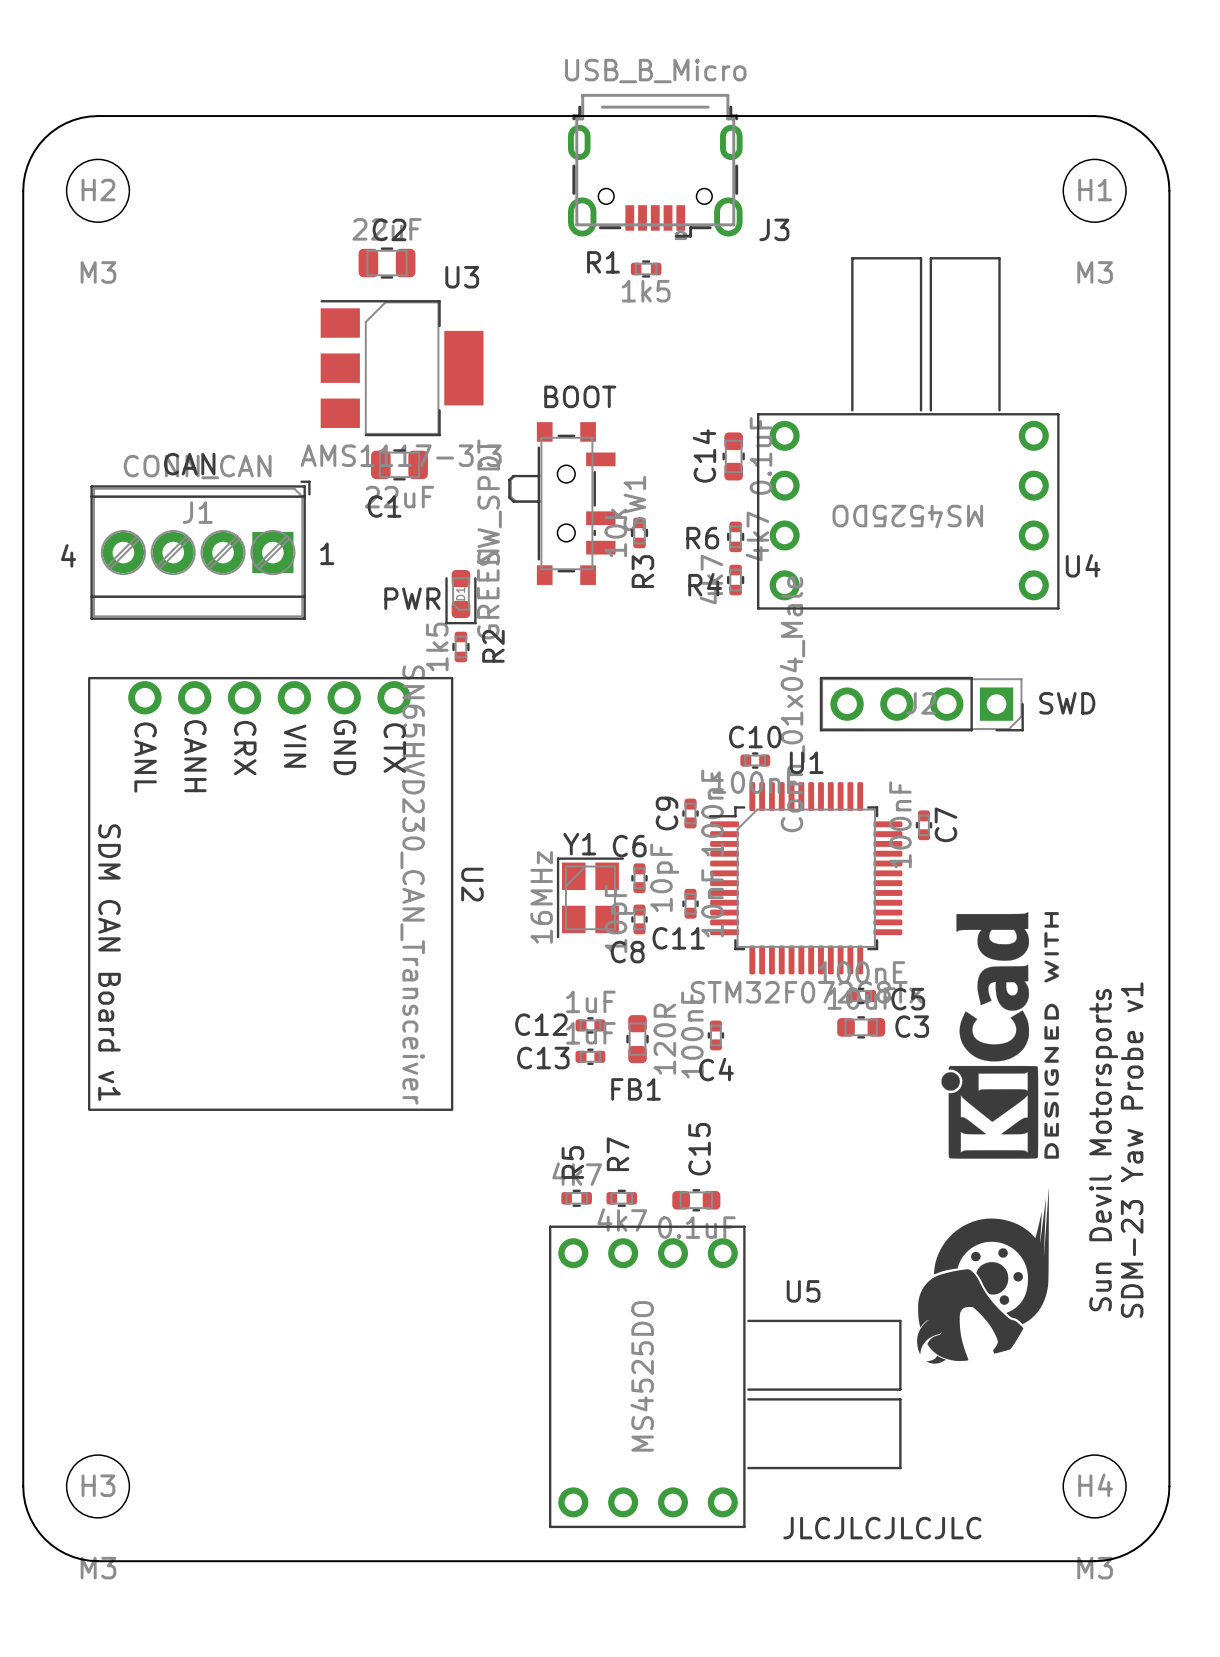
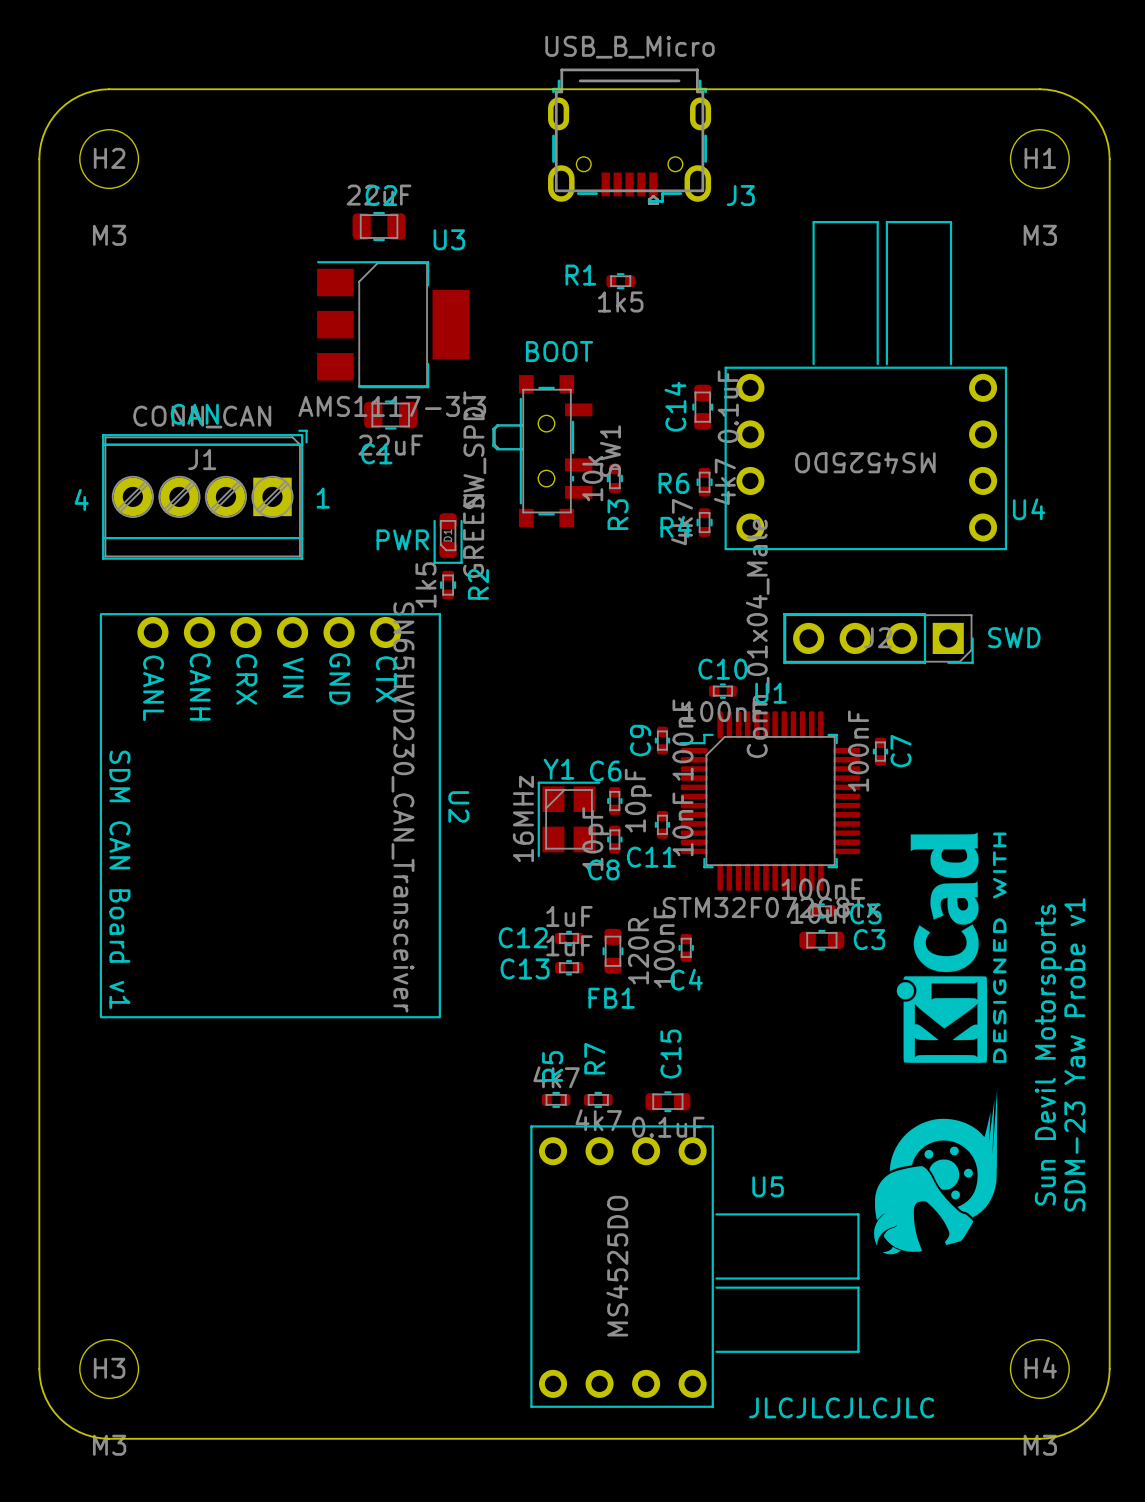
R1 position: (646, 268) -> (620, 281)

